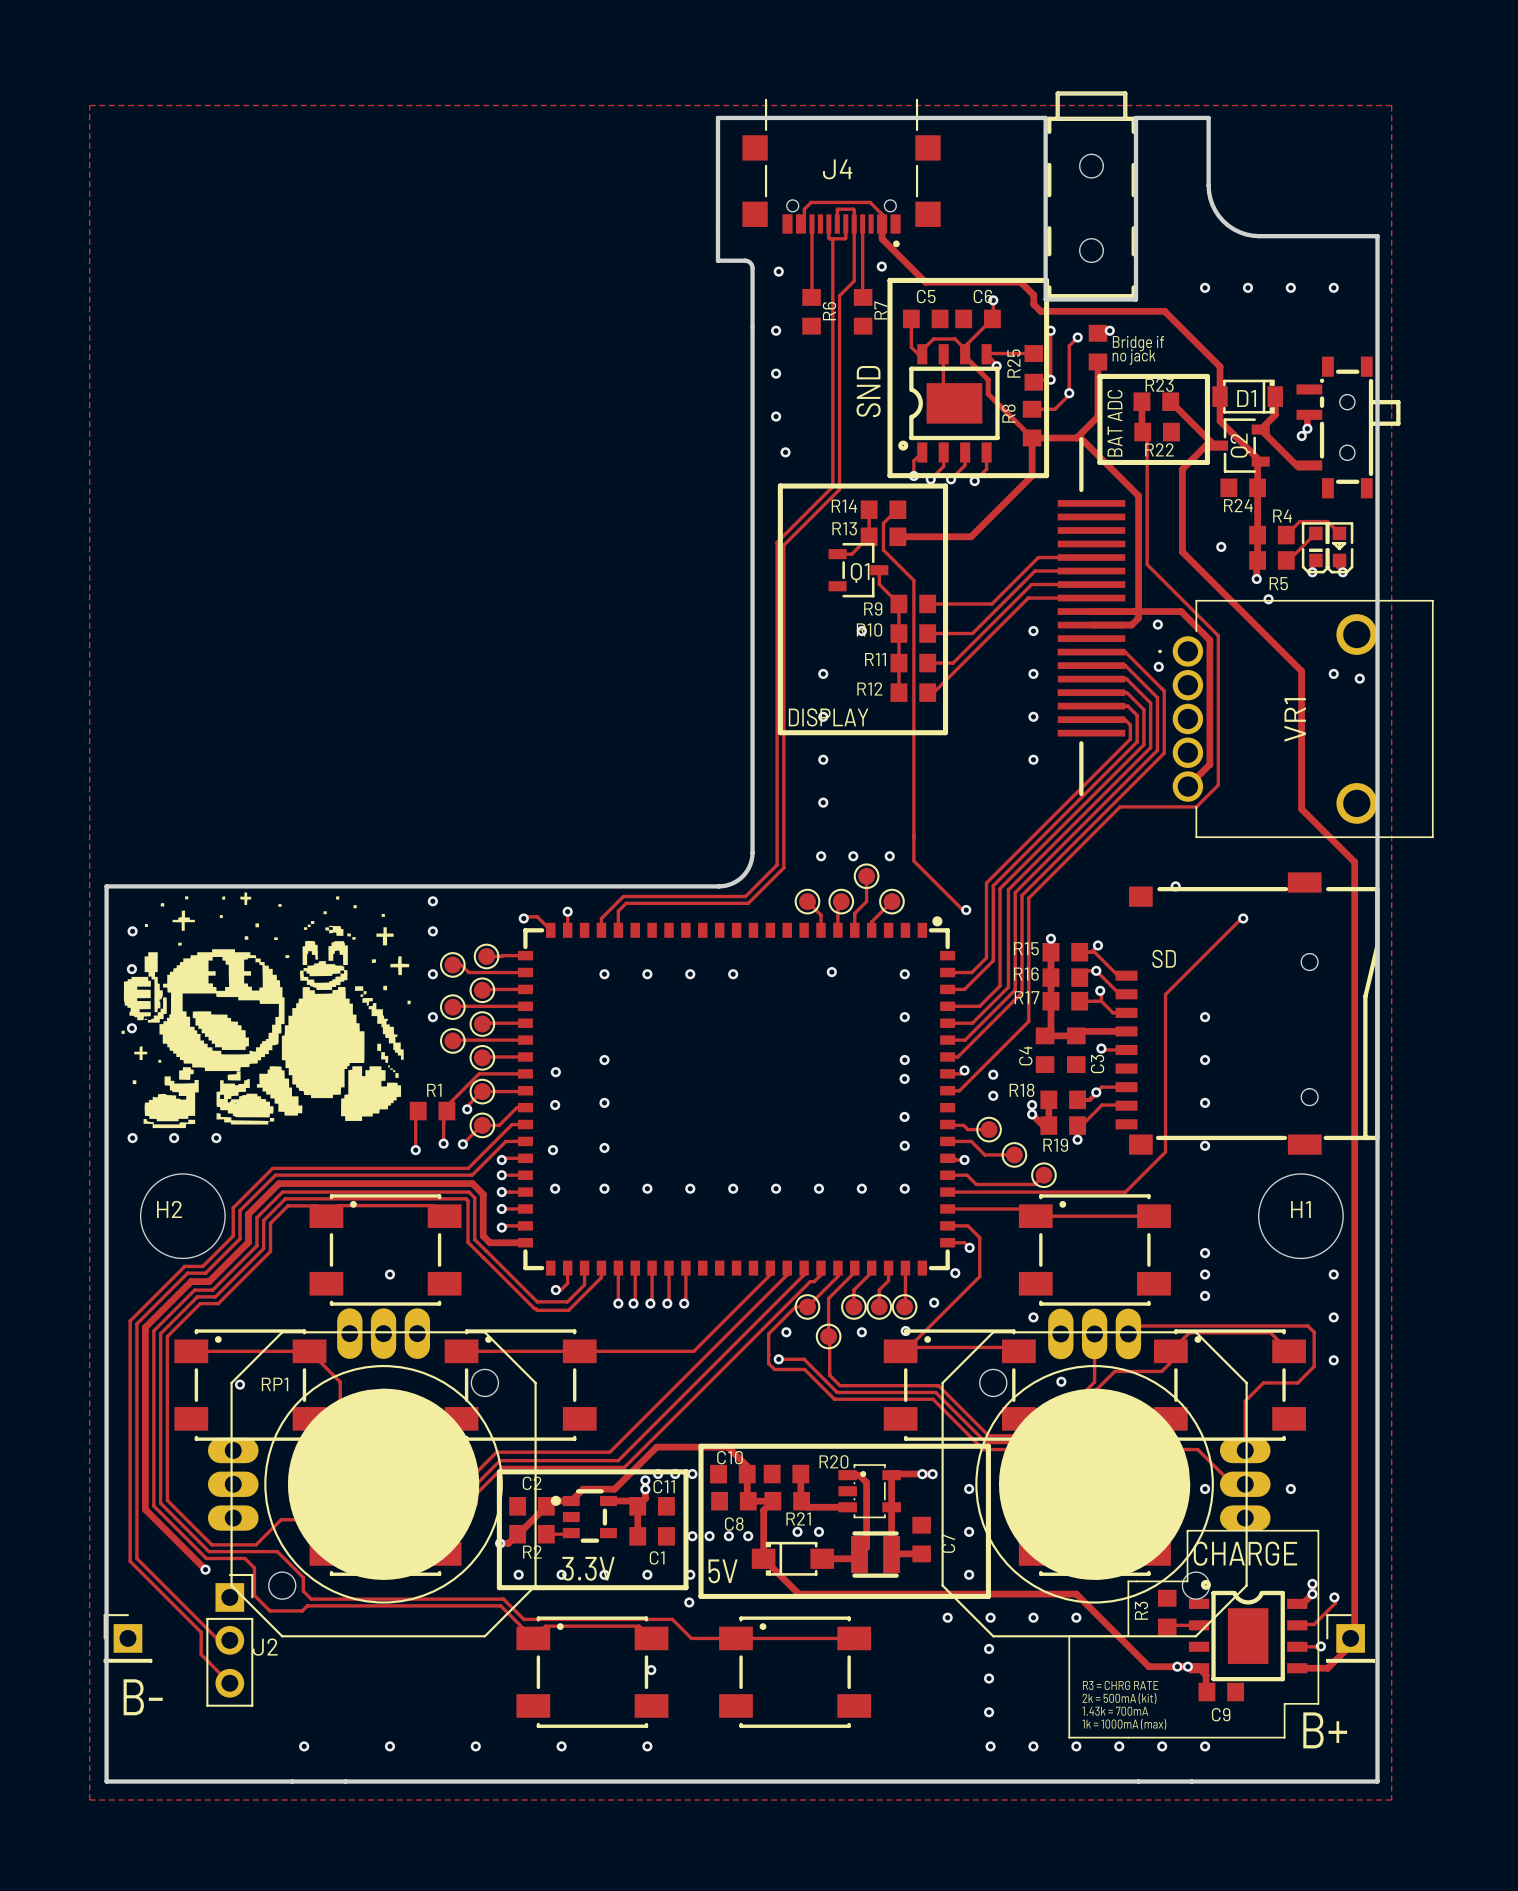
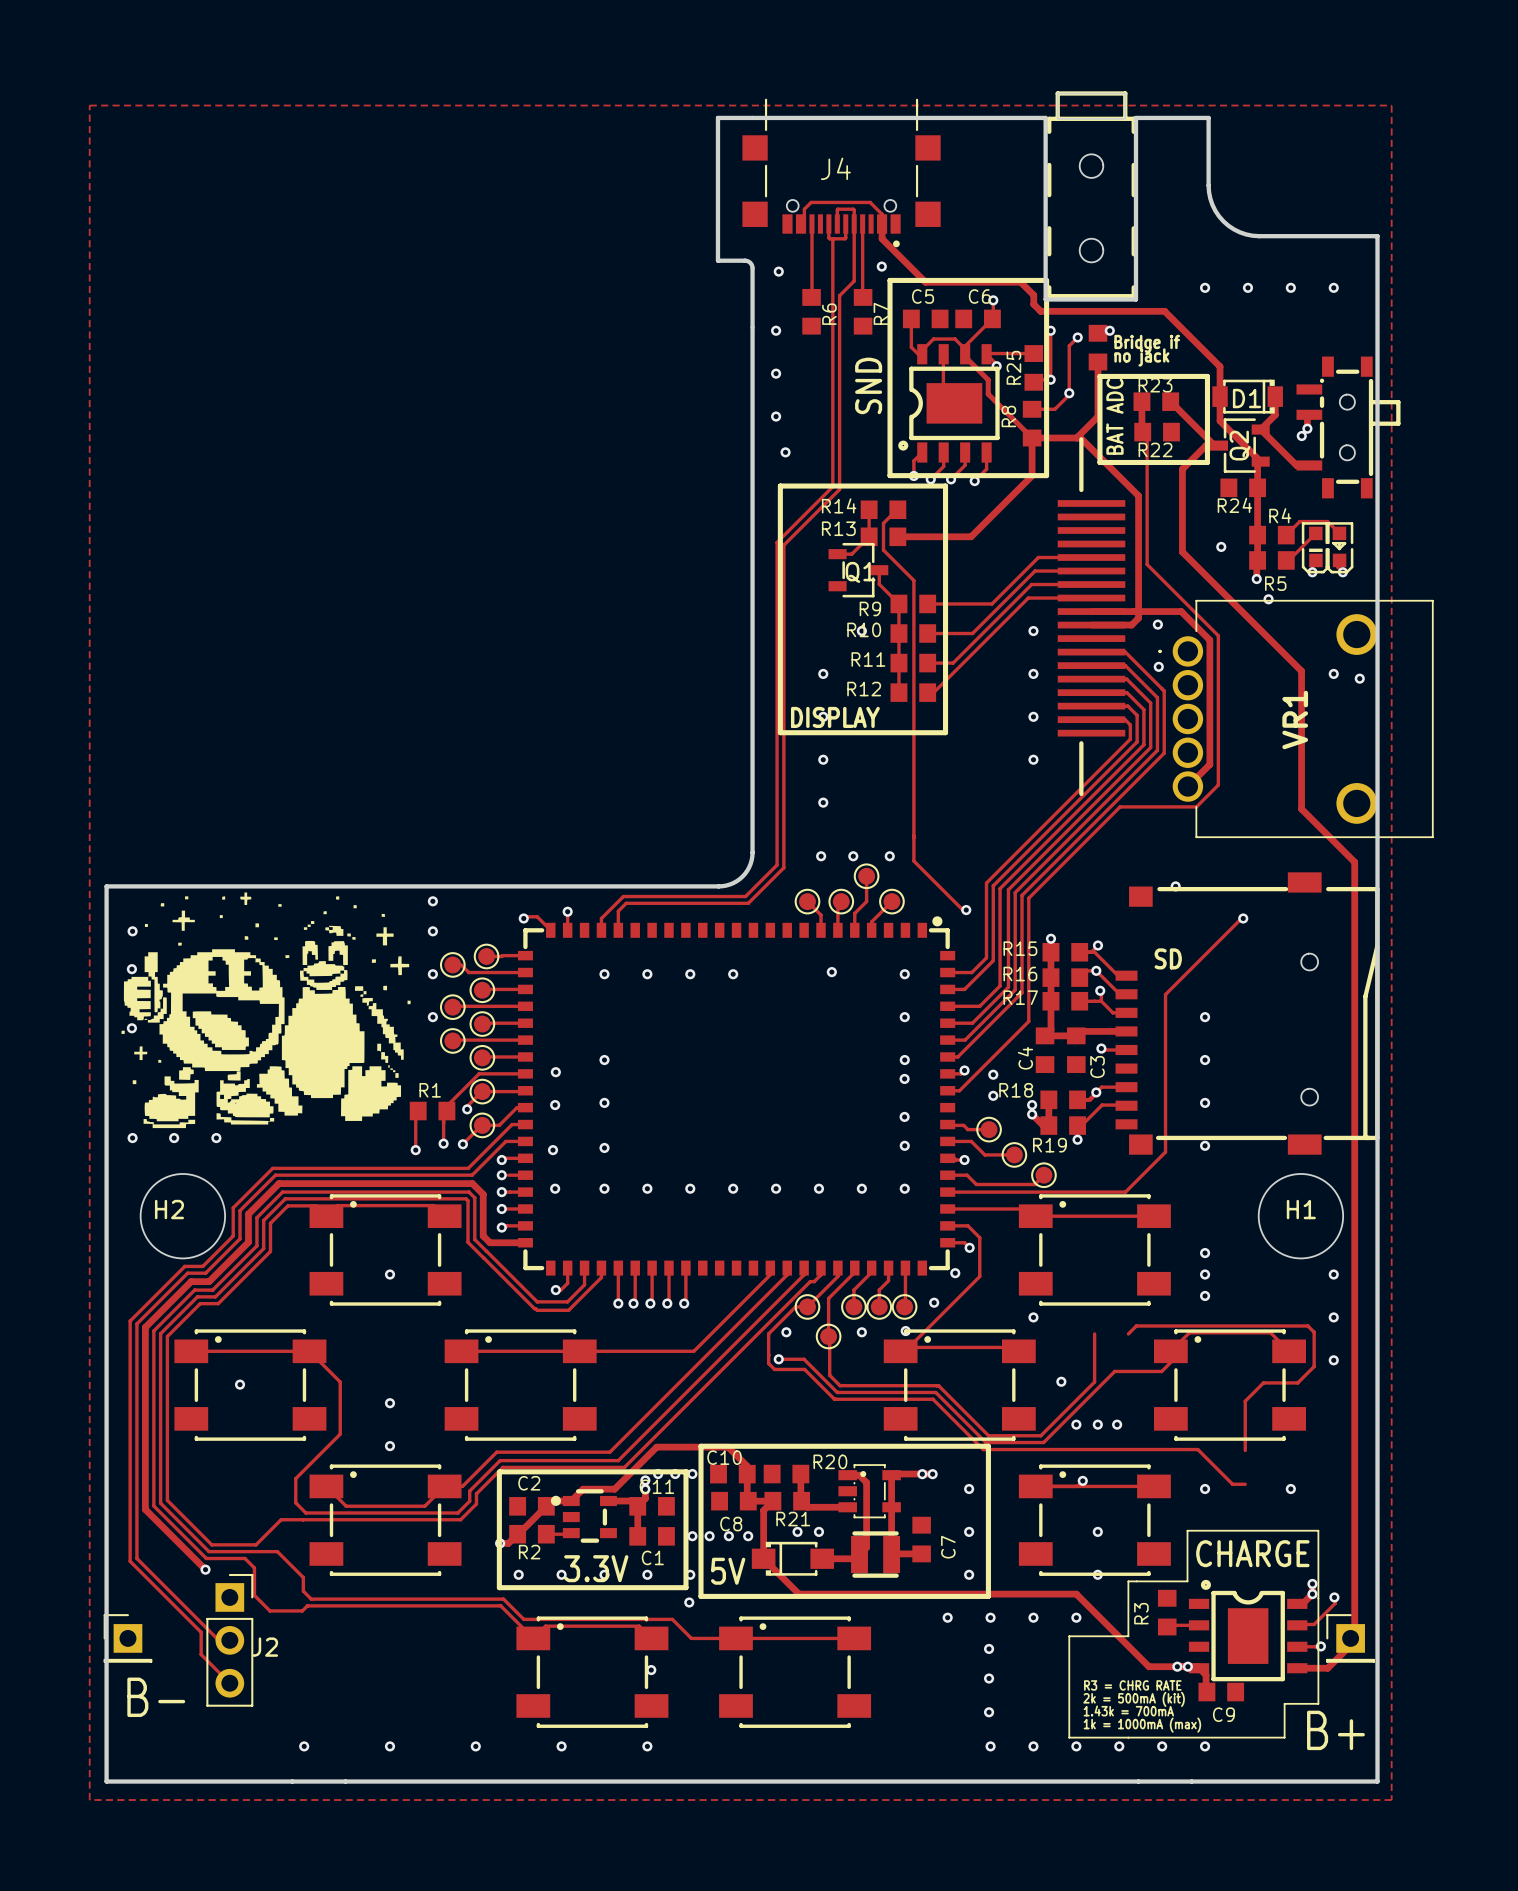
RP1: (372, 1472) -> none
part: (1106, 1472) -> none

